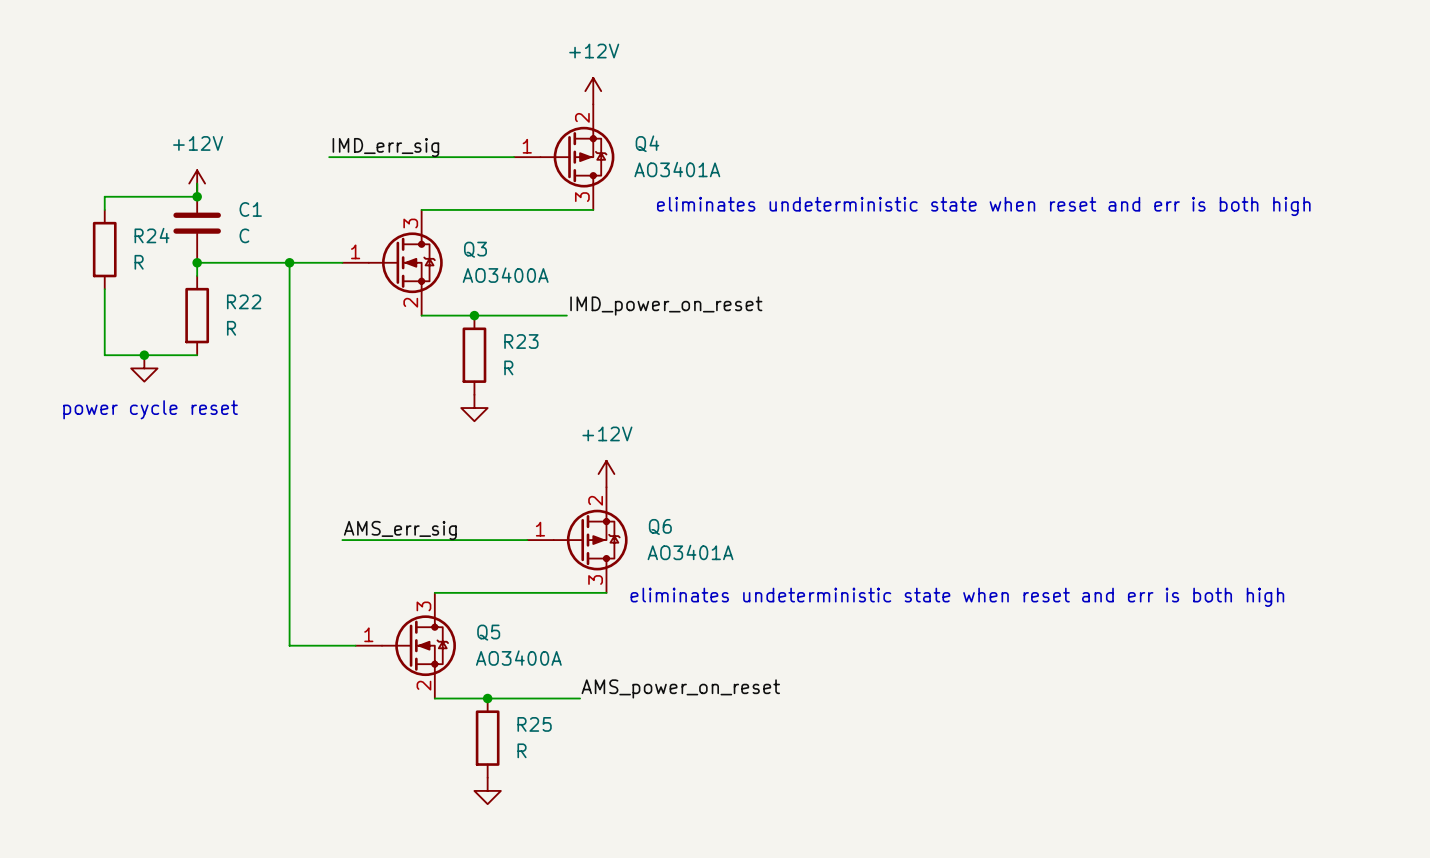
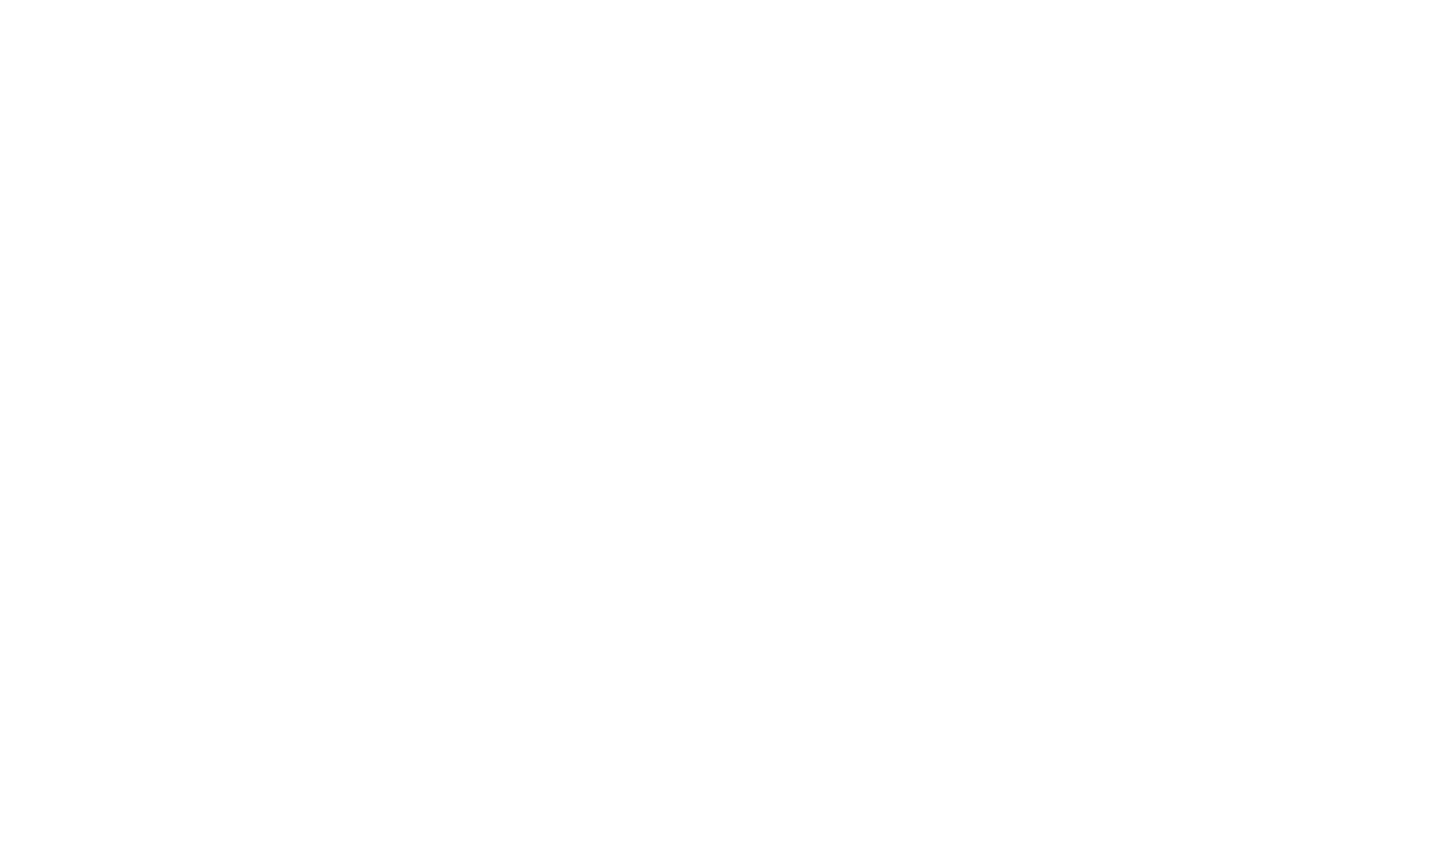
power symbol: +12V (593, 91) -> none
label: IMD_err_sig (385, 147) -> none
wire: (329, 157) (514, 157) -> none
Q4: AO3401A (564, 157) -> none
wire: (197, 183) (197, 196) (104, 196) (104, 209) -> none
power symbol: +12V (197, 183) -> none
junction: (197, 196) -> none
text: eliminates undeterministic state when reset and err is both high (983, 206) -> none
wire: (421, 209) (593, 209) -> none
C1: C (197, 223) -> none
R24: R (104, 249) -> none
junction: (197, 262) -> none
wire: (289, 262) (289, 645) (355, 645) -> none
junction: (289, 262) -> none
wire: (342, 262) (197, 262) (197, 275) -> none
Q3: AO3400A (392, 262) -> none
wire: (104, 289) (104, 355) (197, 355) -> none
label: IMD_power_on_reset (666, 306) -> none
R22: R (197, 315) -> none
wire: (421, 315) (566, 315) -> none
junction: (474, 315) -> none
junction: (144, 355) -> none
R23: R (474, 355) -> none
power symbol: (144, 368) -> none
power symbol: (474, 408) -> none
text: power cycle reset (150, 409) -> none
power symbol: +12V (606, 474) -> none
label: AMS_err_sig (400, 530) -> none
wire: (342, 540) (527, 540) -> none
Q6: AO3401A (577, 540) -> none
wire: (434, 592) (606, 592) -> none
text: eliminates undeterministic state when reset and err is both high (957, 597) -> none
Q5: AO3400A (405, 645) -> none
label: AMS_power_on_reset (680, 688) -> none
wire: (434, 698) (580, 698) -> none
junction: (487, 698) -> none
R25: R (487, 738) -> none
power symbol: (487, 790) -> none

